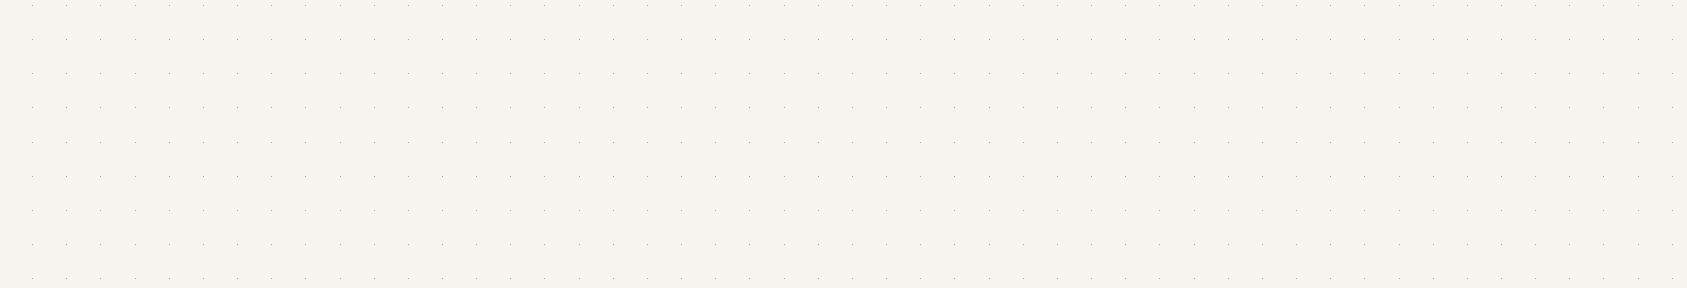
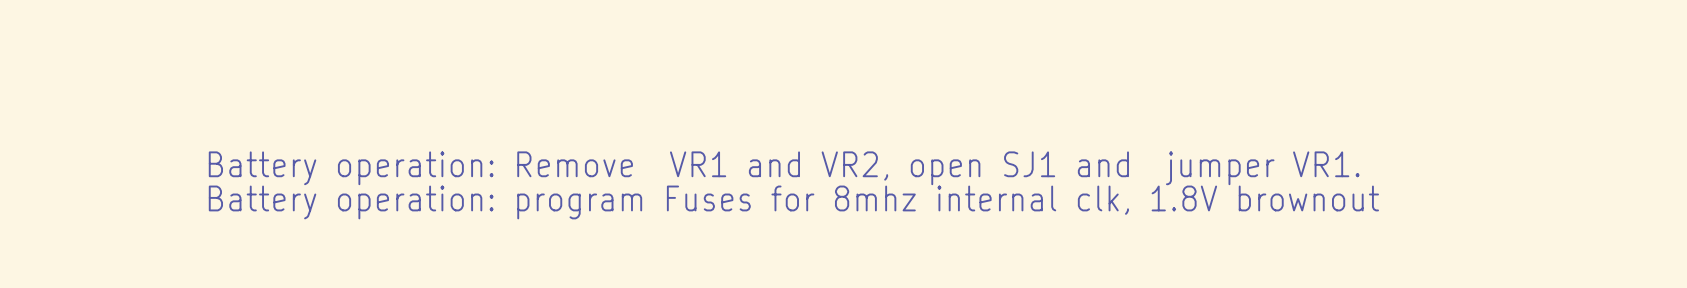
text: none -> Battery operation: Remove VR1 and VR2, open SJ1 and jumper VR1. (784, 168)
text: none -> Battery operation: program Fuses for 8mhz internal clk, 1.8V brownout (793, 202)

